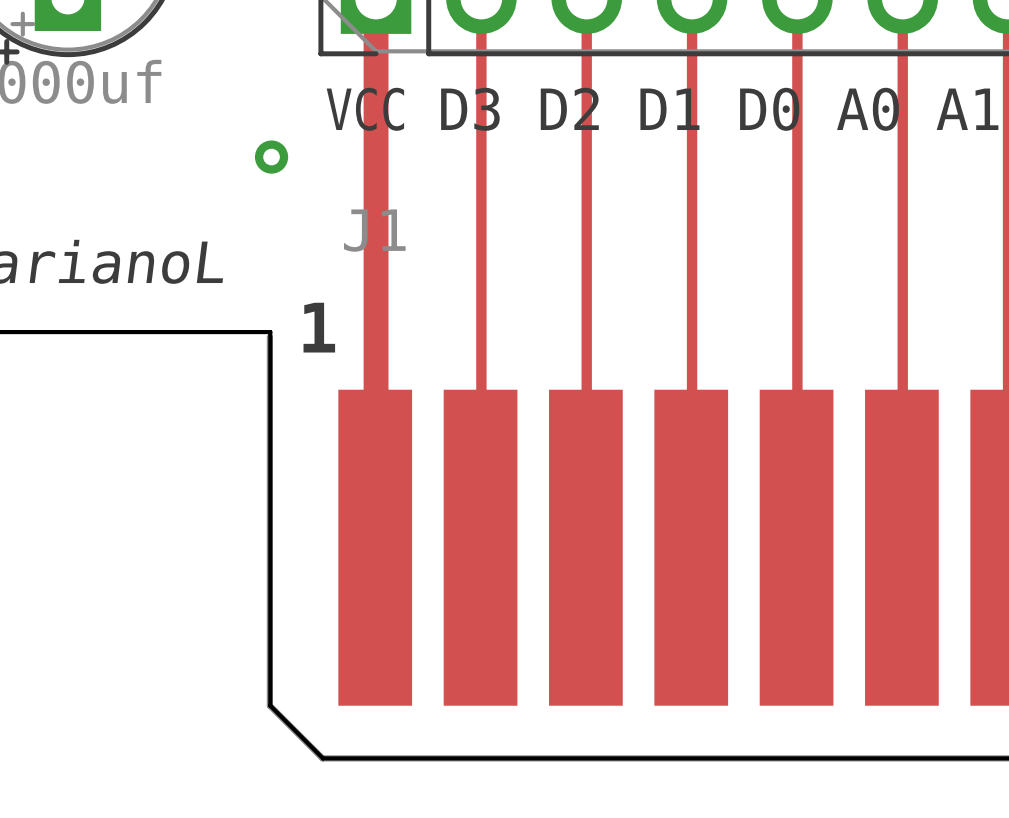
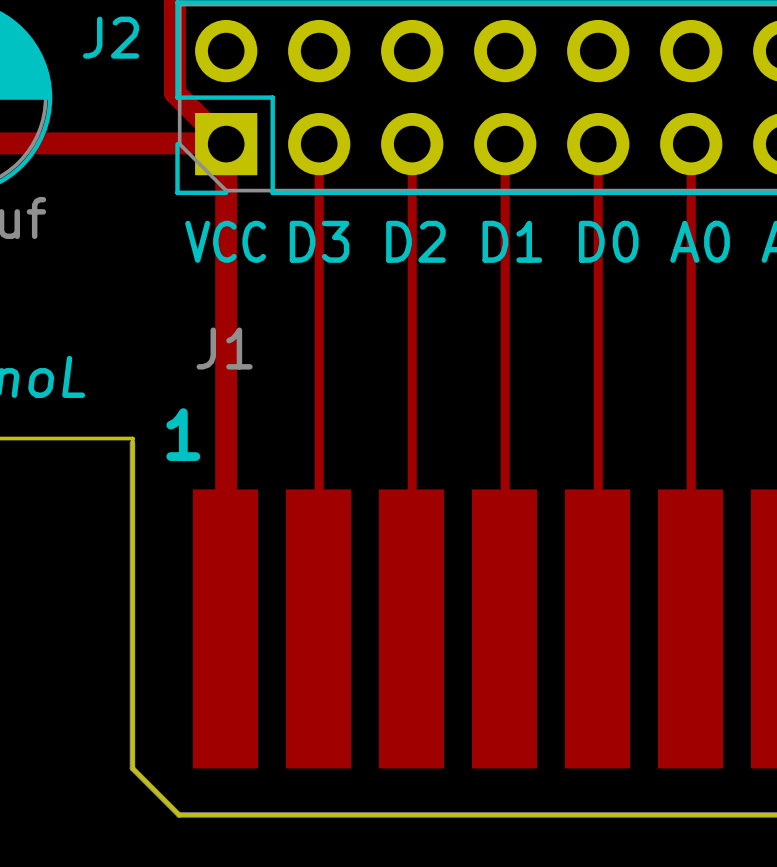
via: (271, 157) -> none

